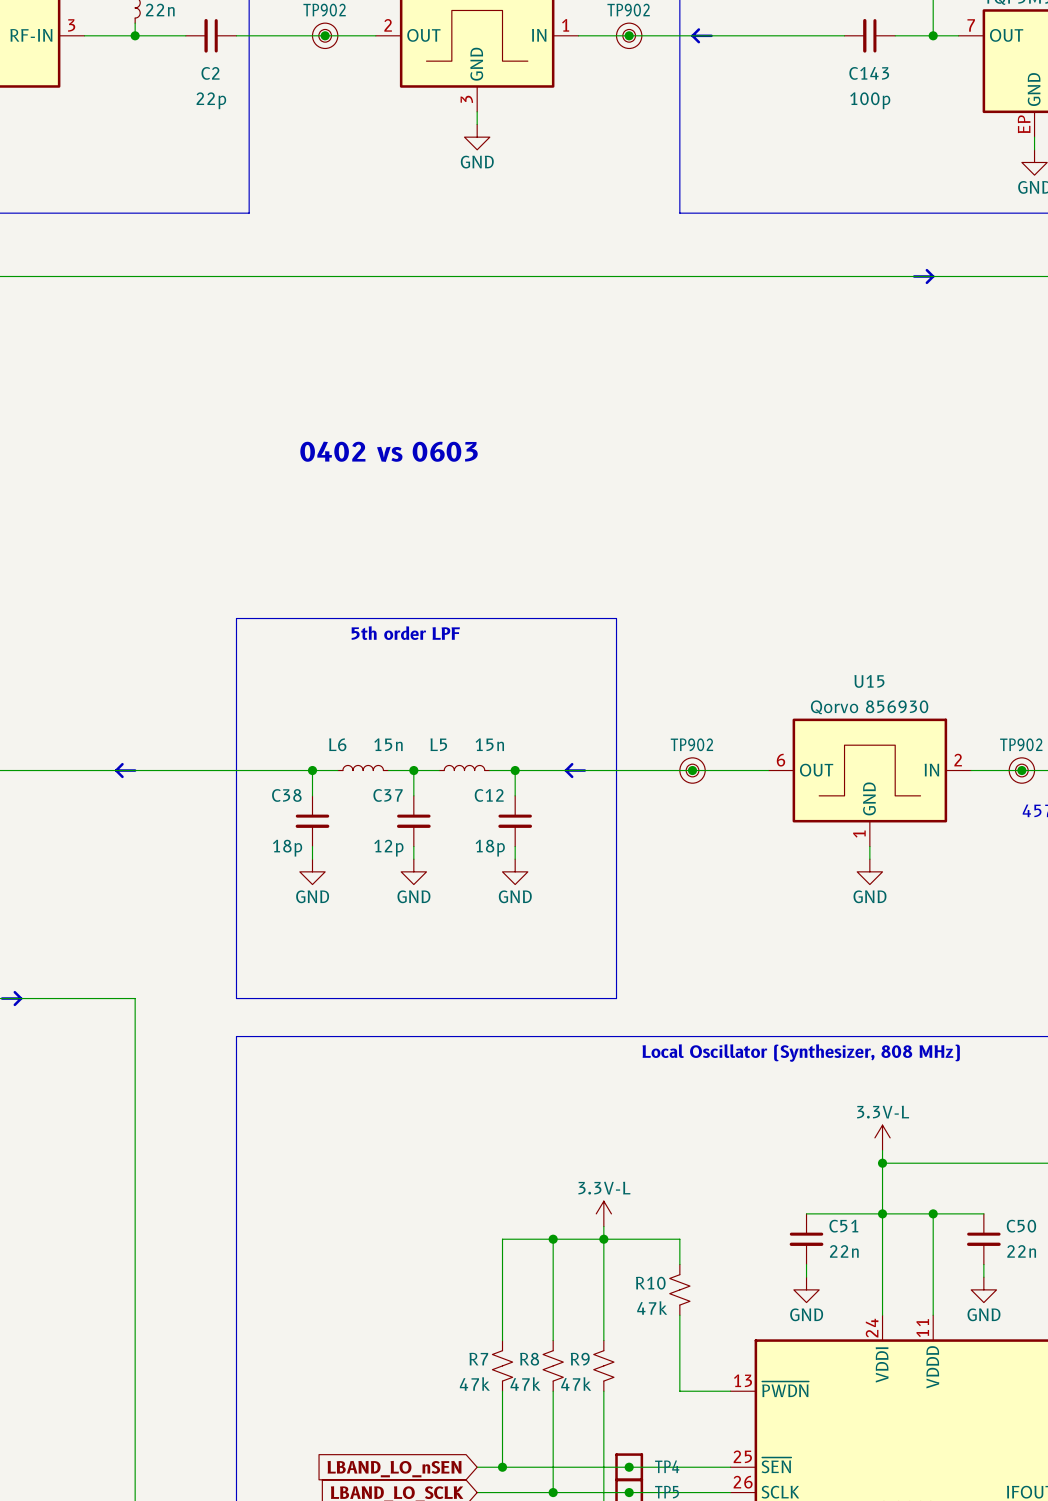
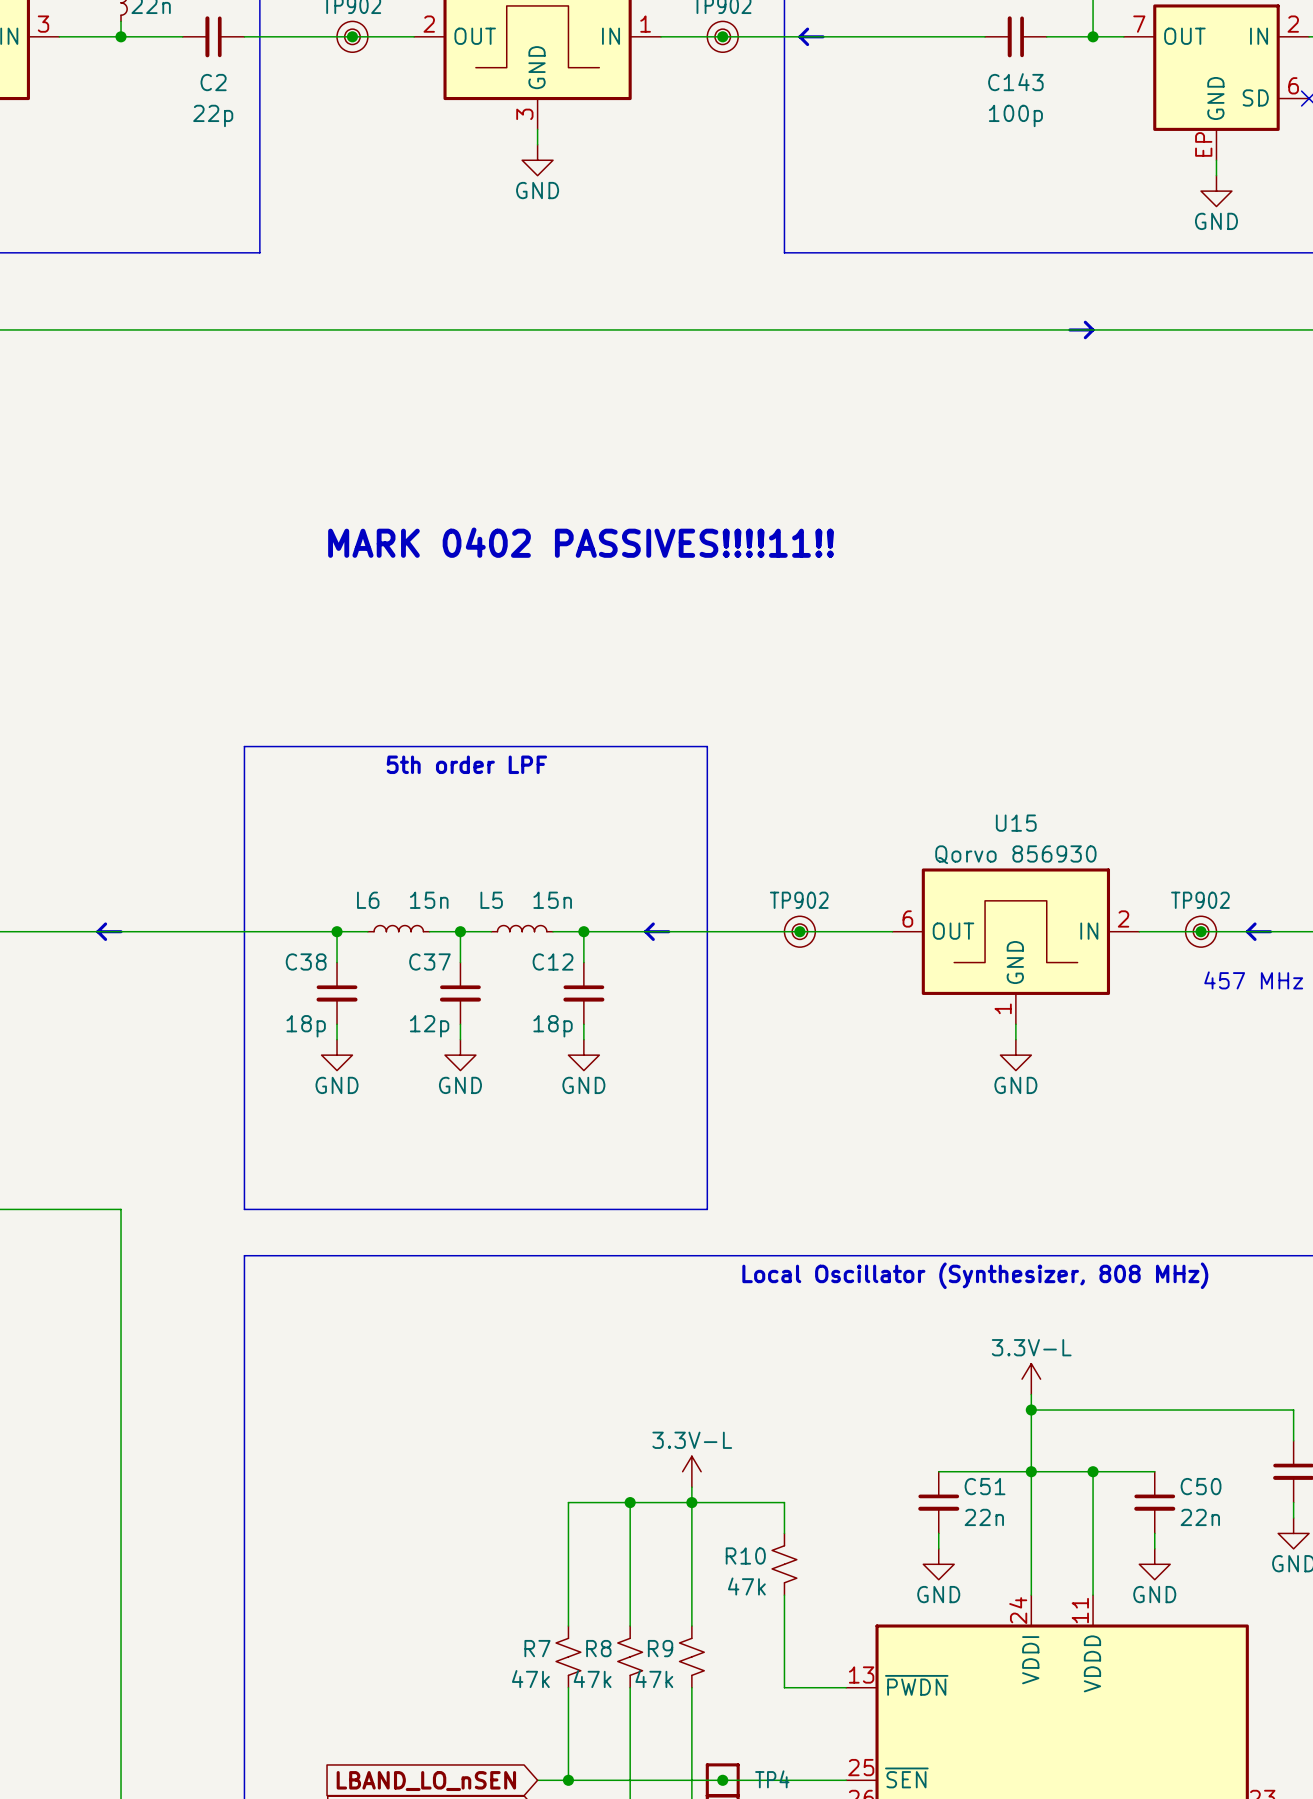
text: 0402 vs 0603 (389, 451) -> MARK 0402 PASSIVES!!!!11!! (581, 542)

